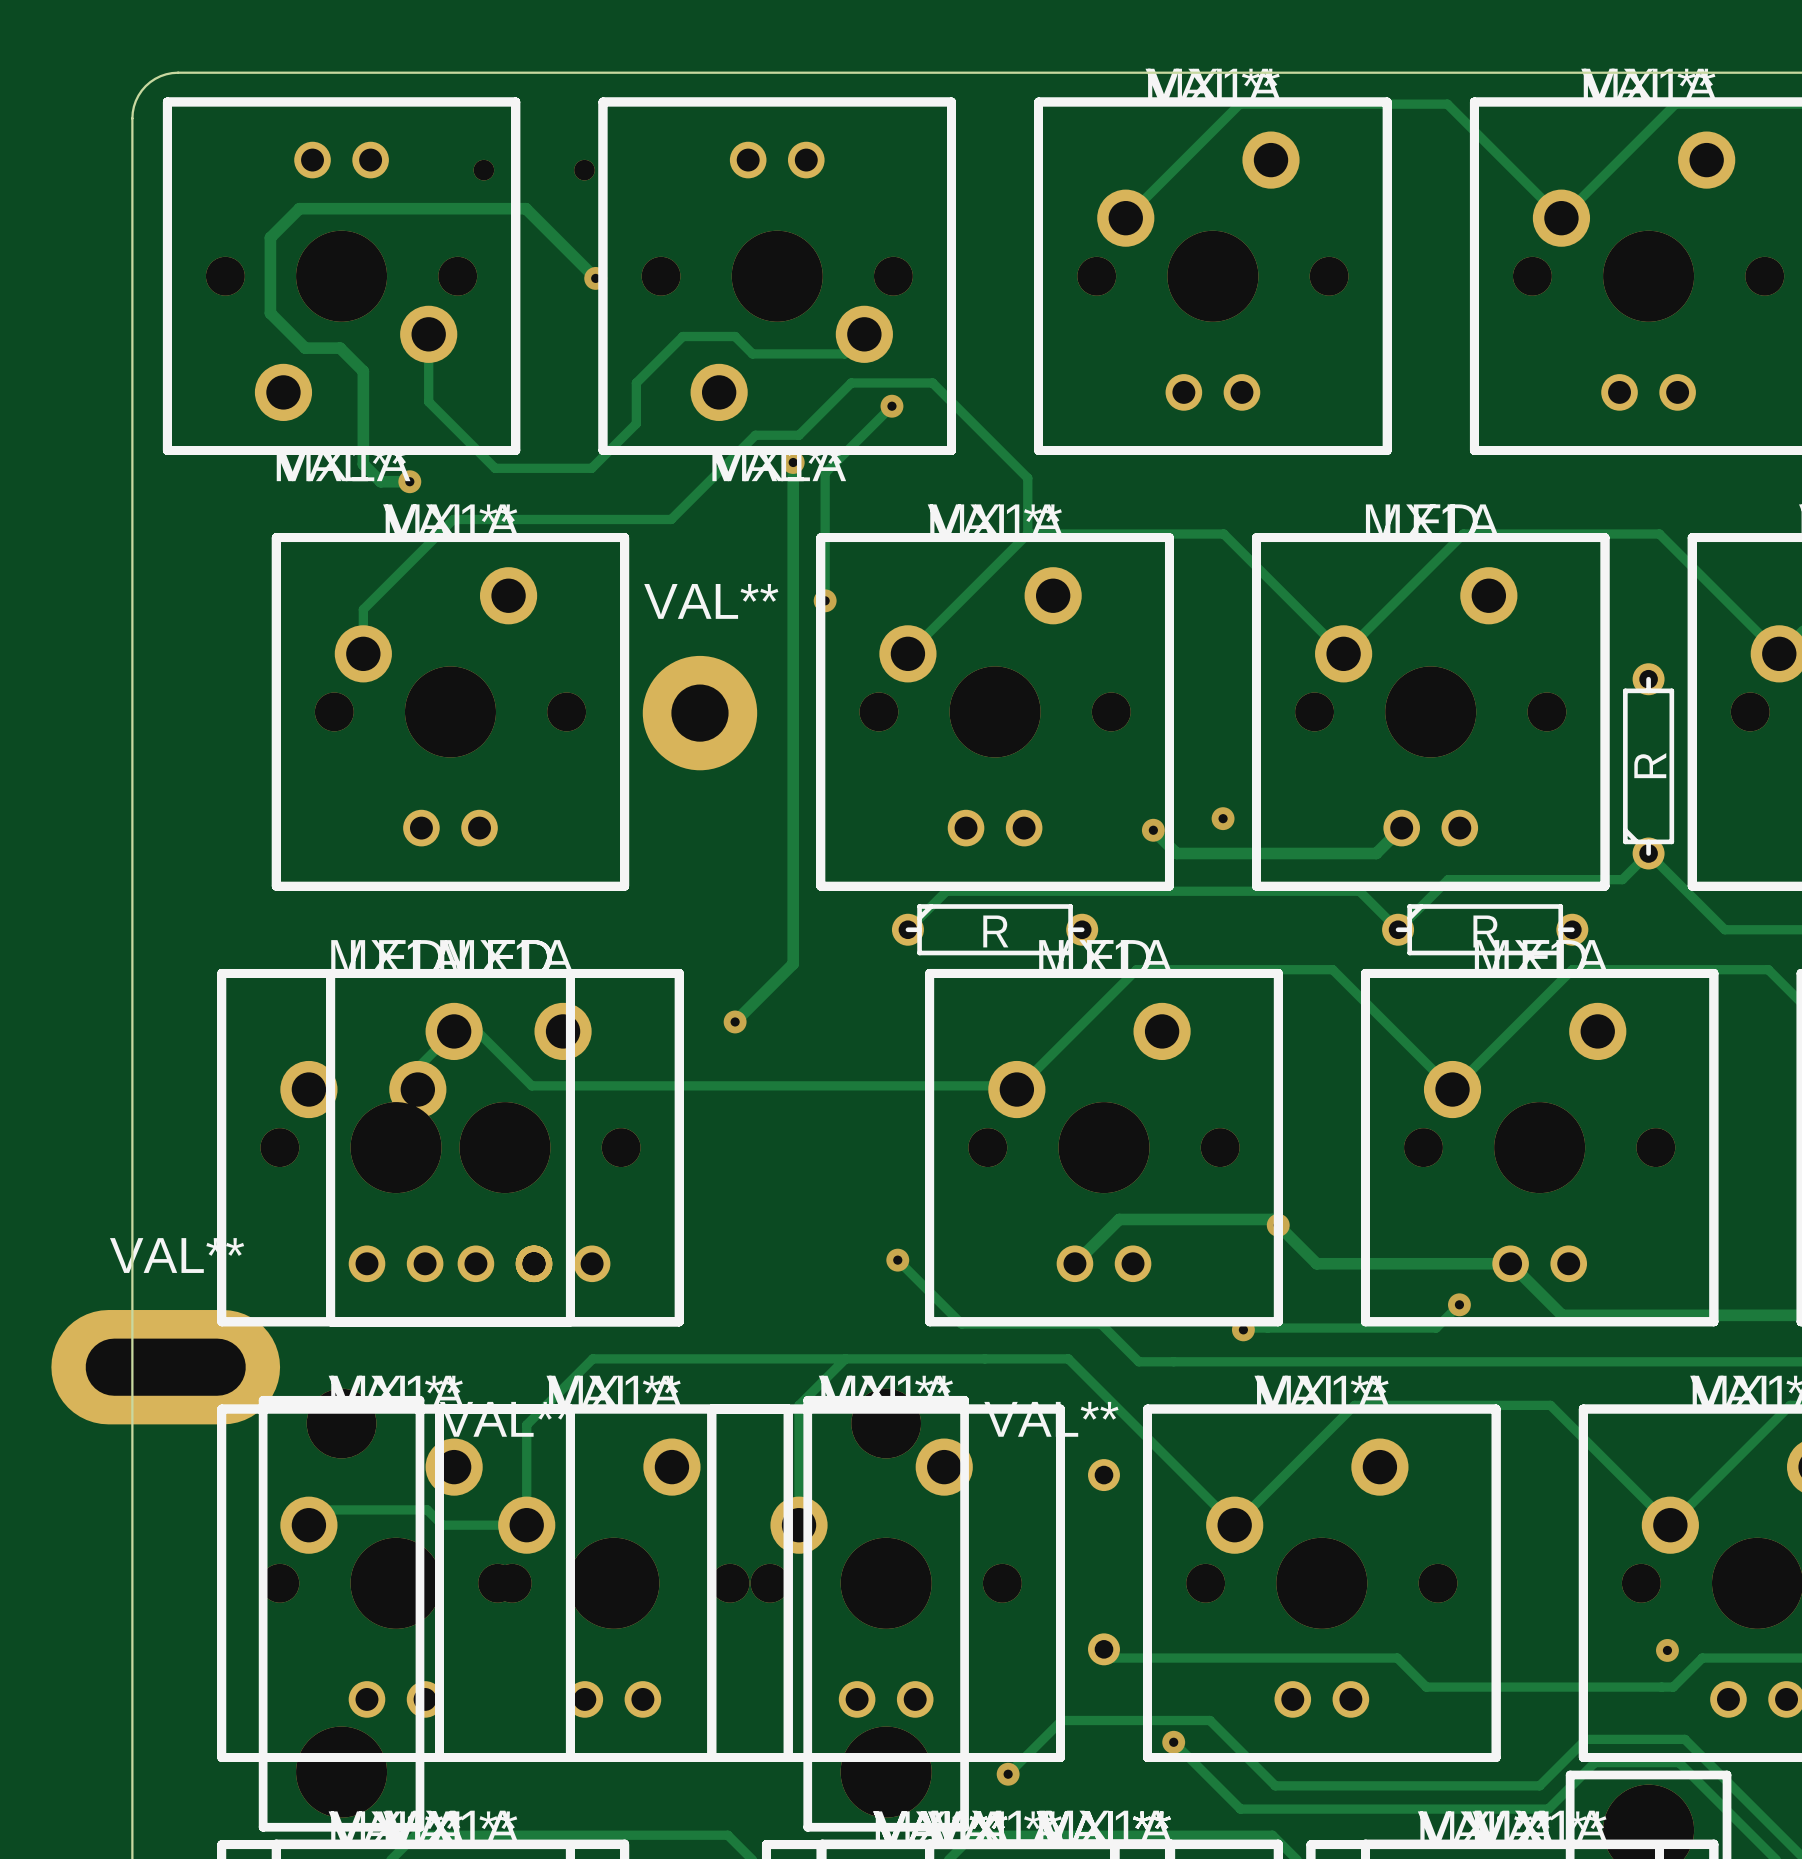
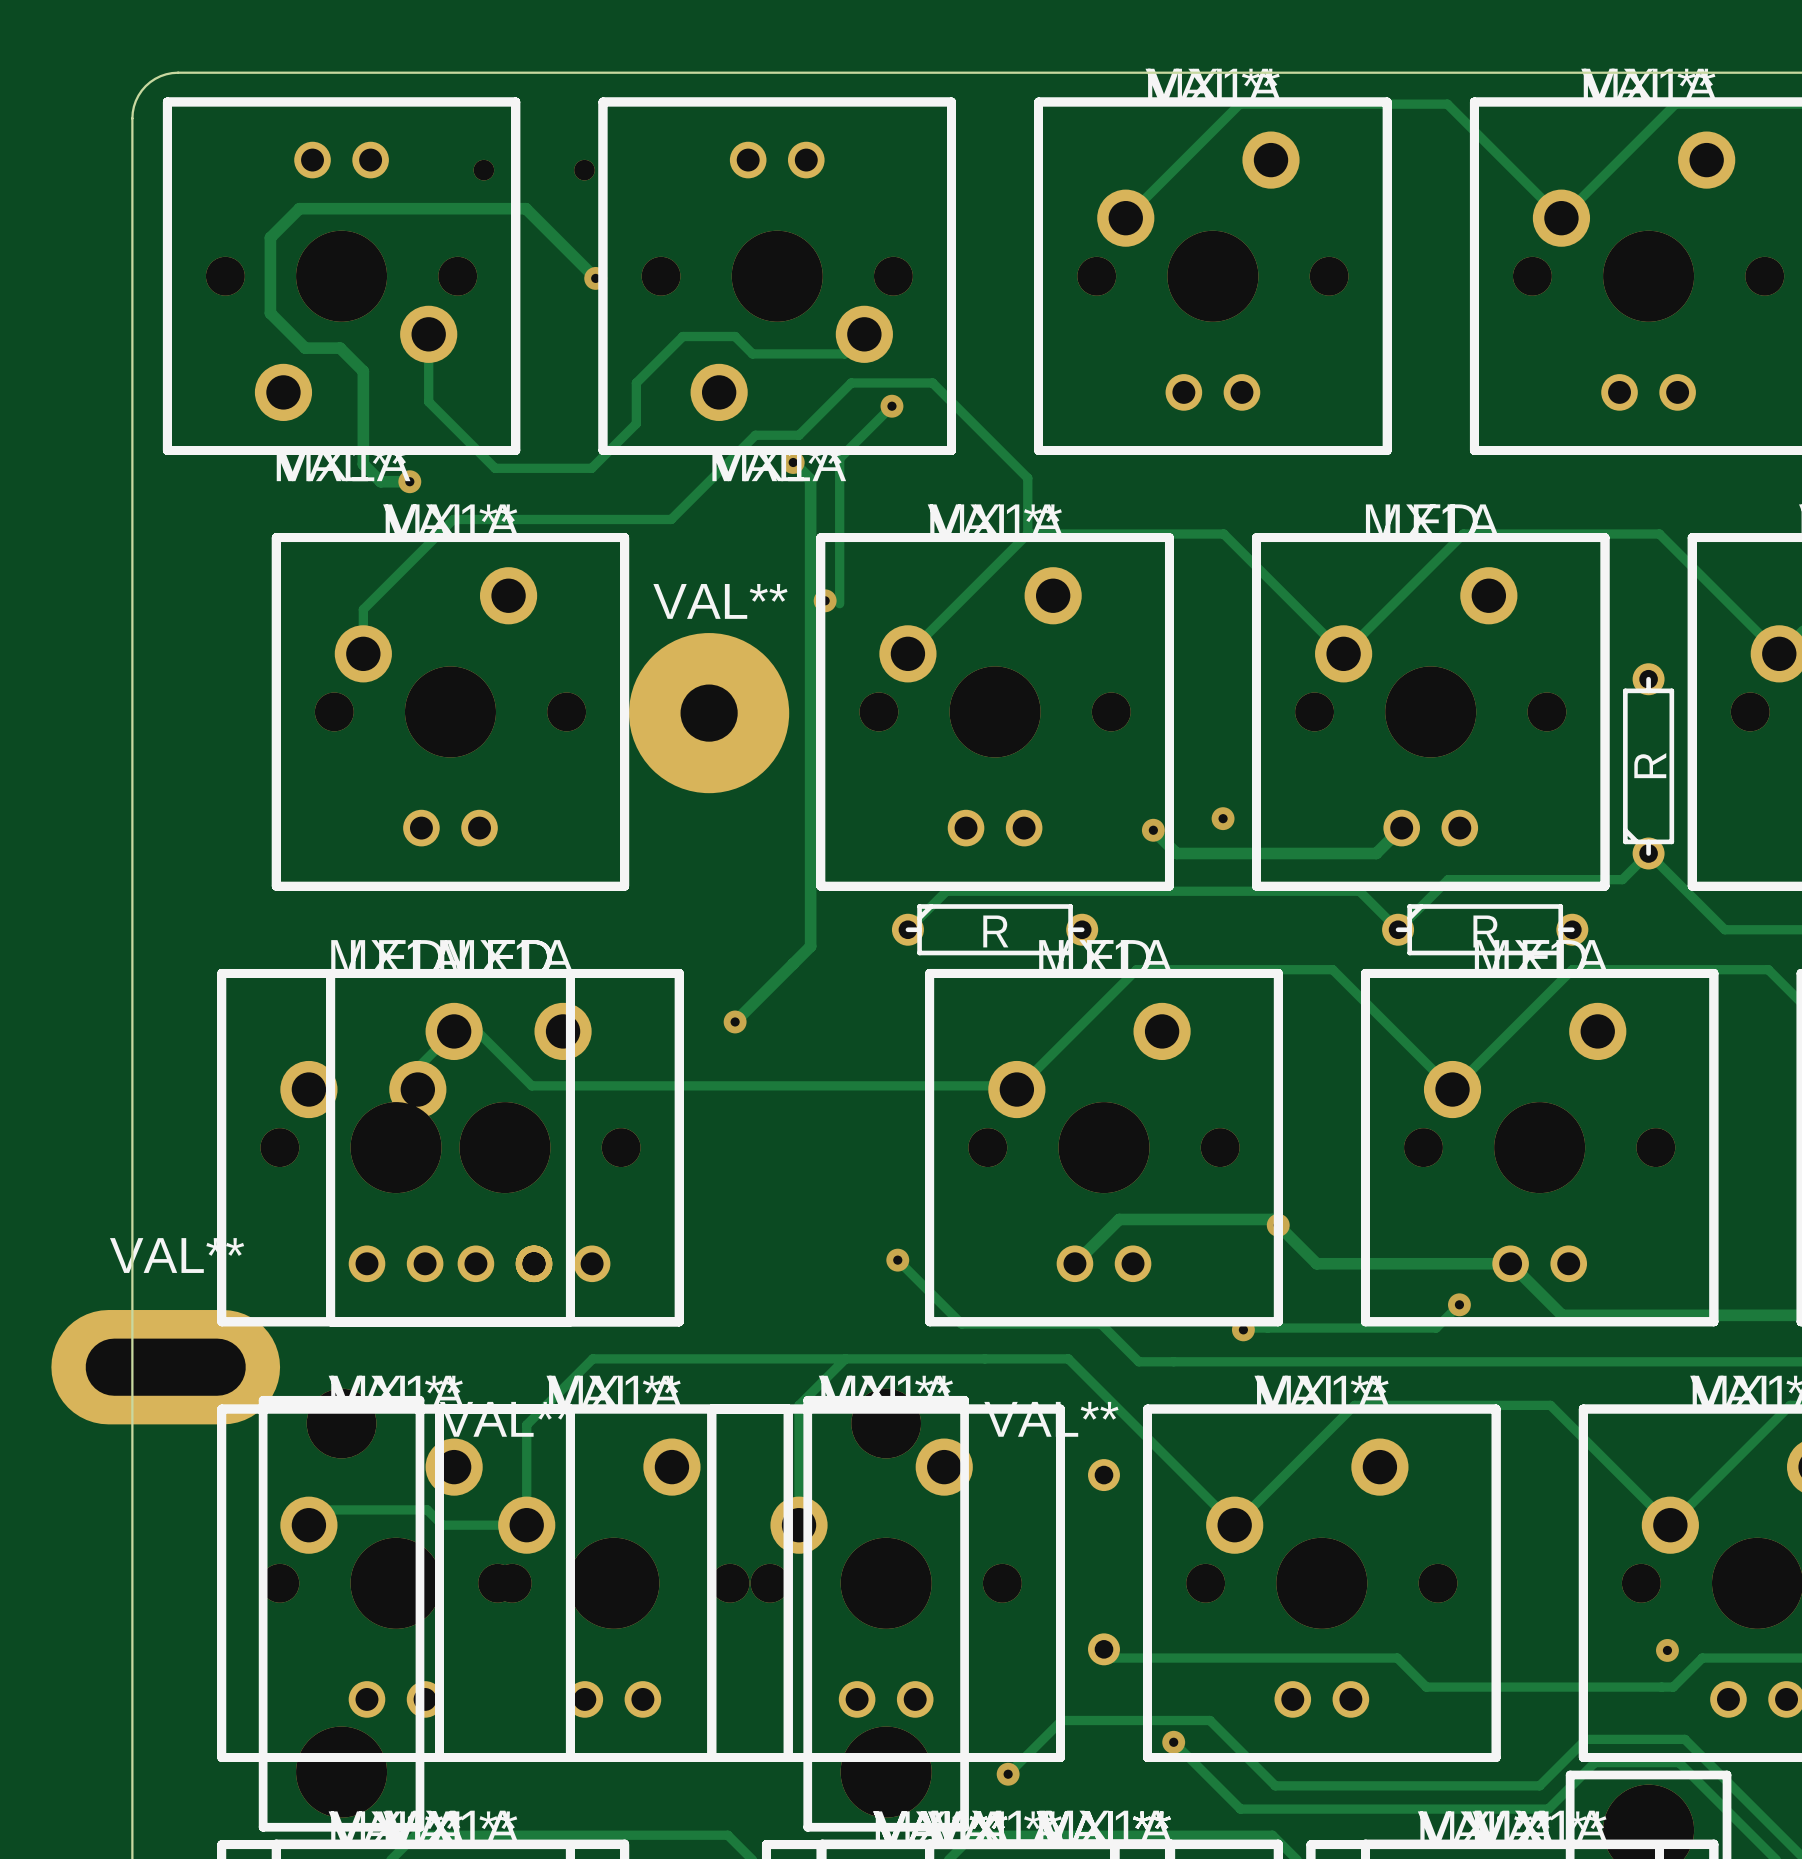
track: (839, 458) (825, 473) (825, 600) -> (839, 458) (839, 603)
track: (793, 462) (793, 963) -> (793, 462) (810, 479) (810, 946) (793, 963)
part footprint: [642, 655, 758, 771] -> [629, 633, 790, 794]

